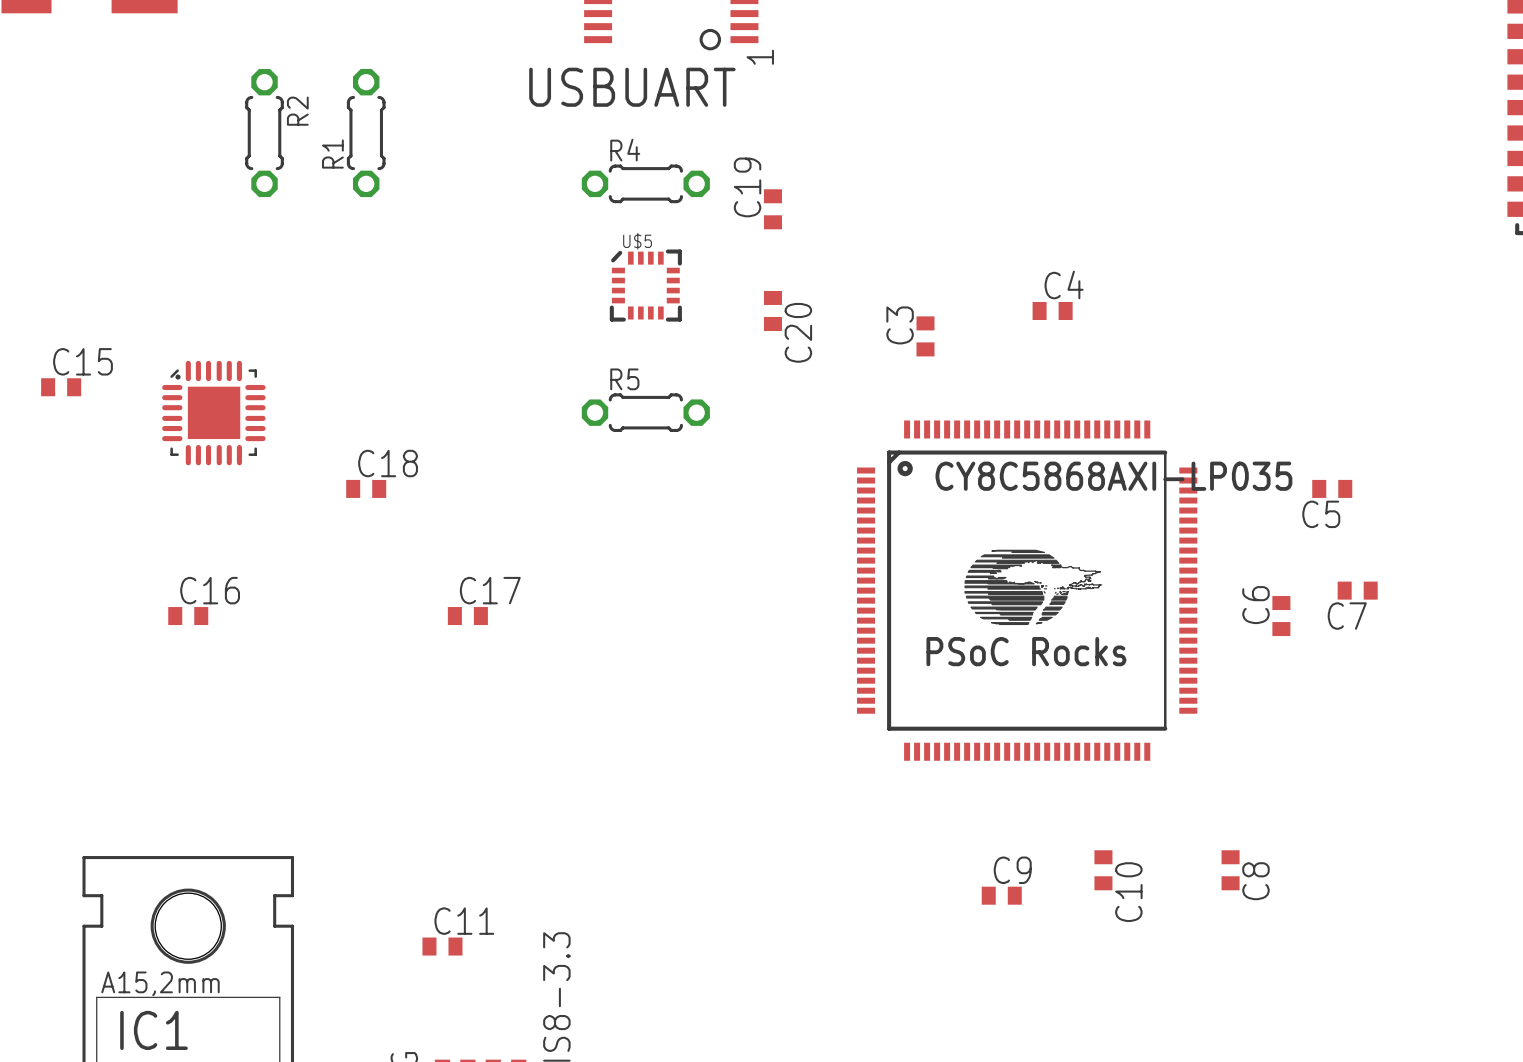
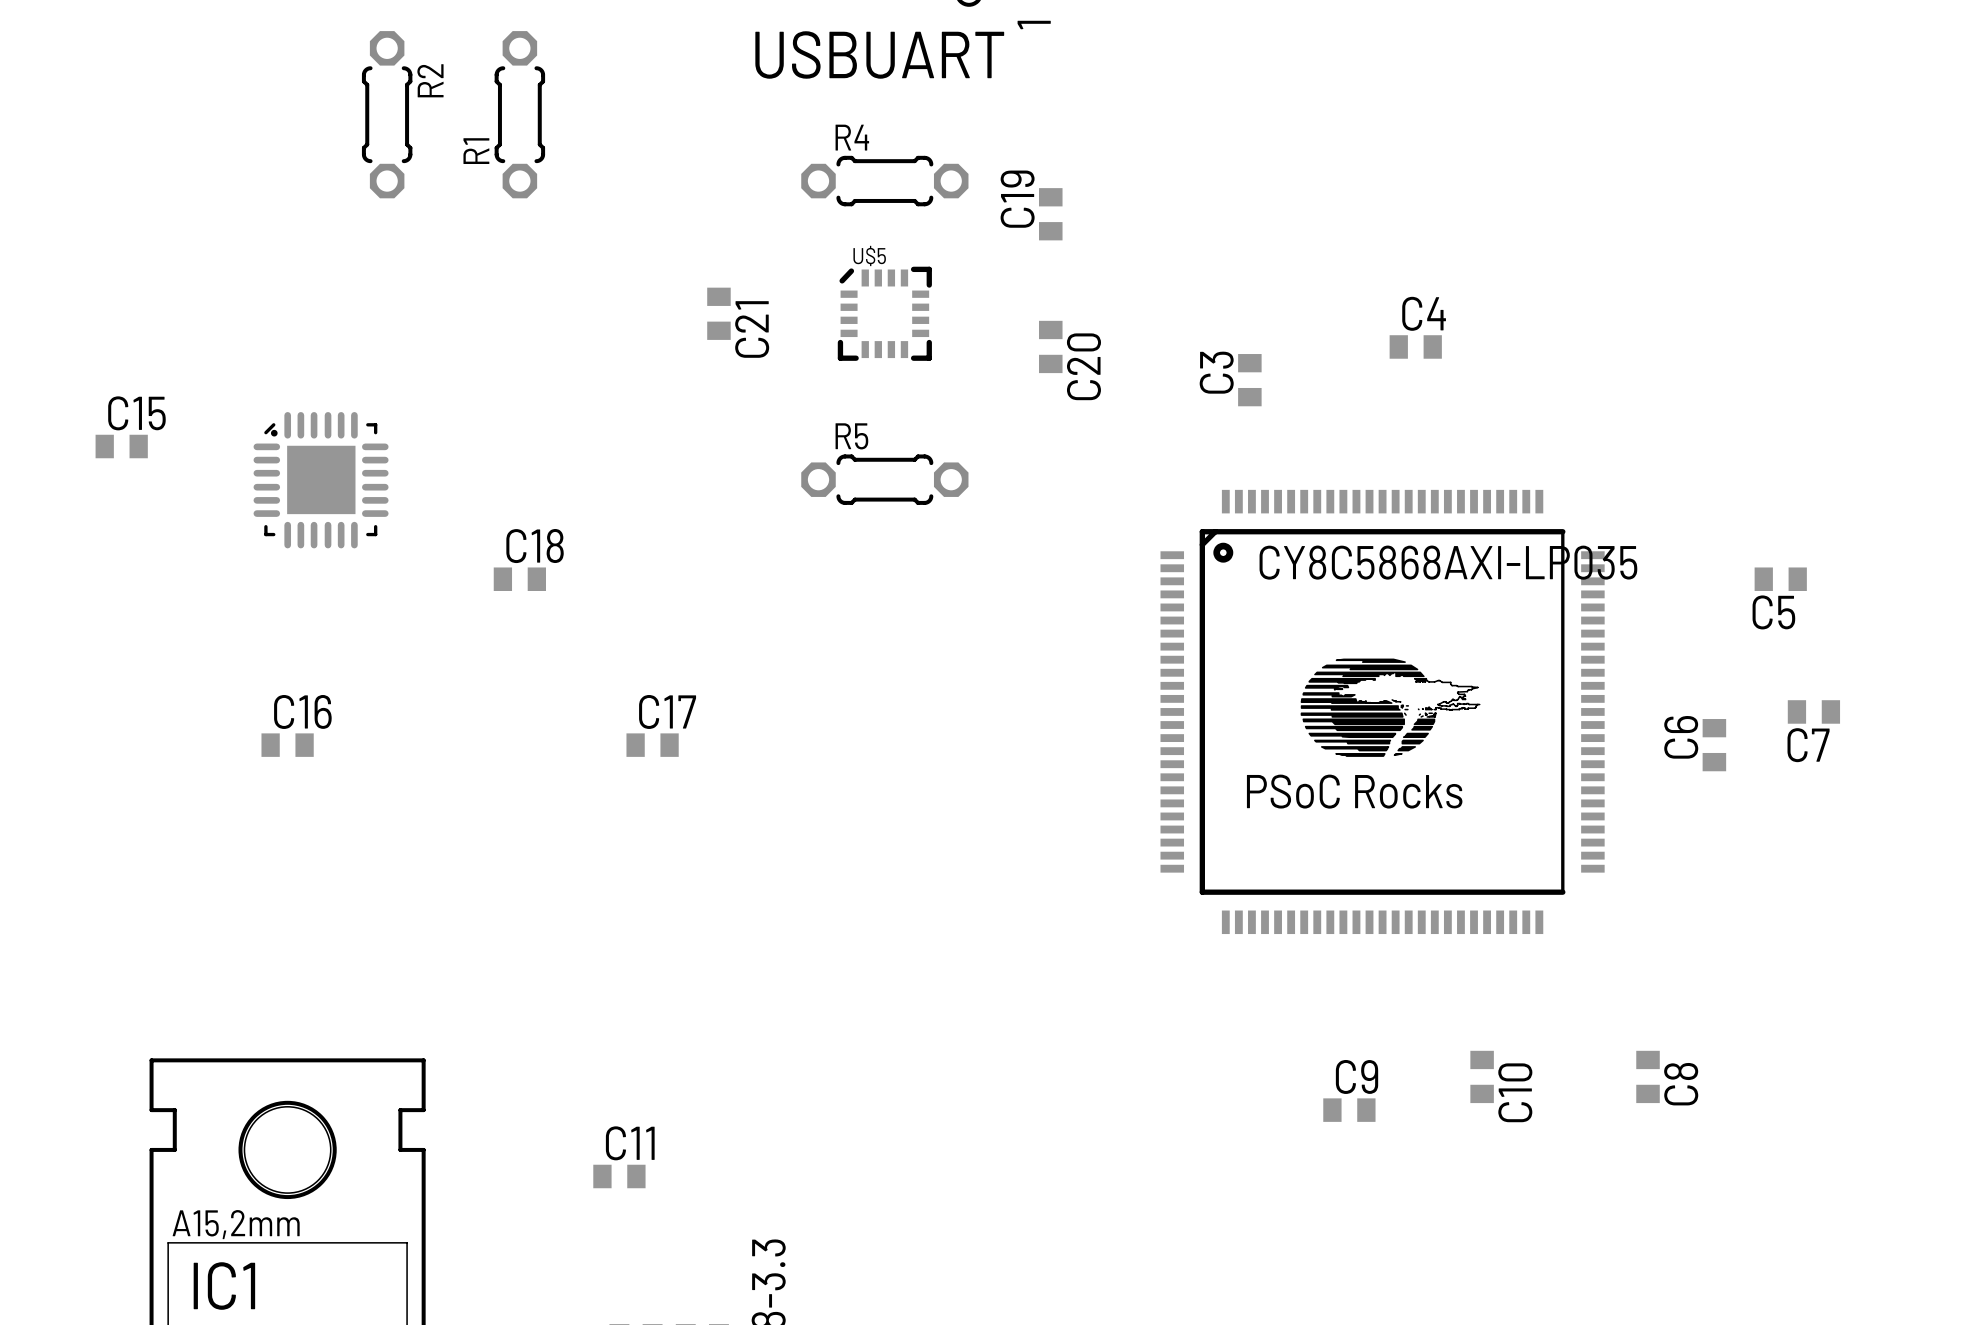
C21: none -> (718, 313)

